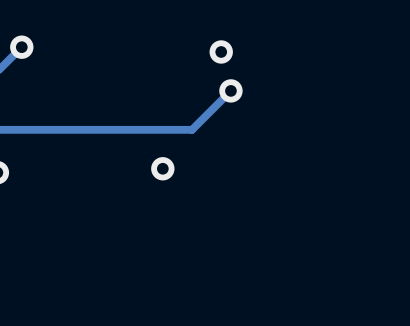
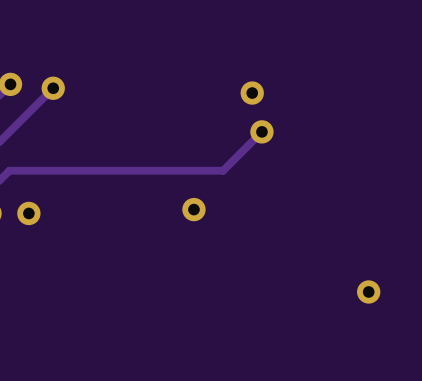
via: none -> (368, 291)

